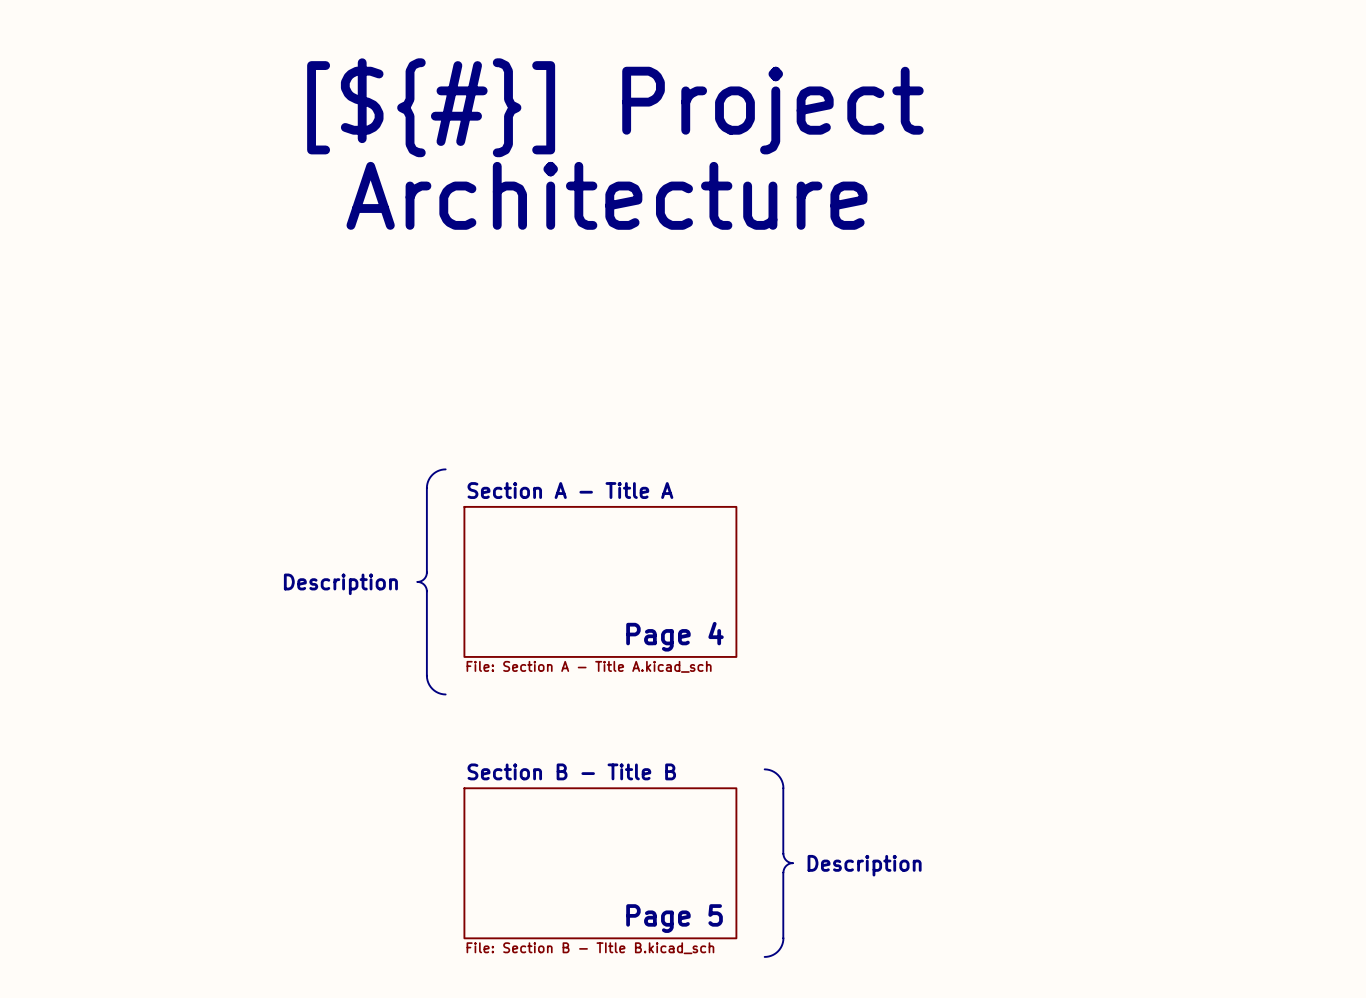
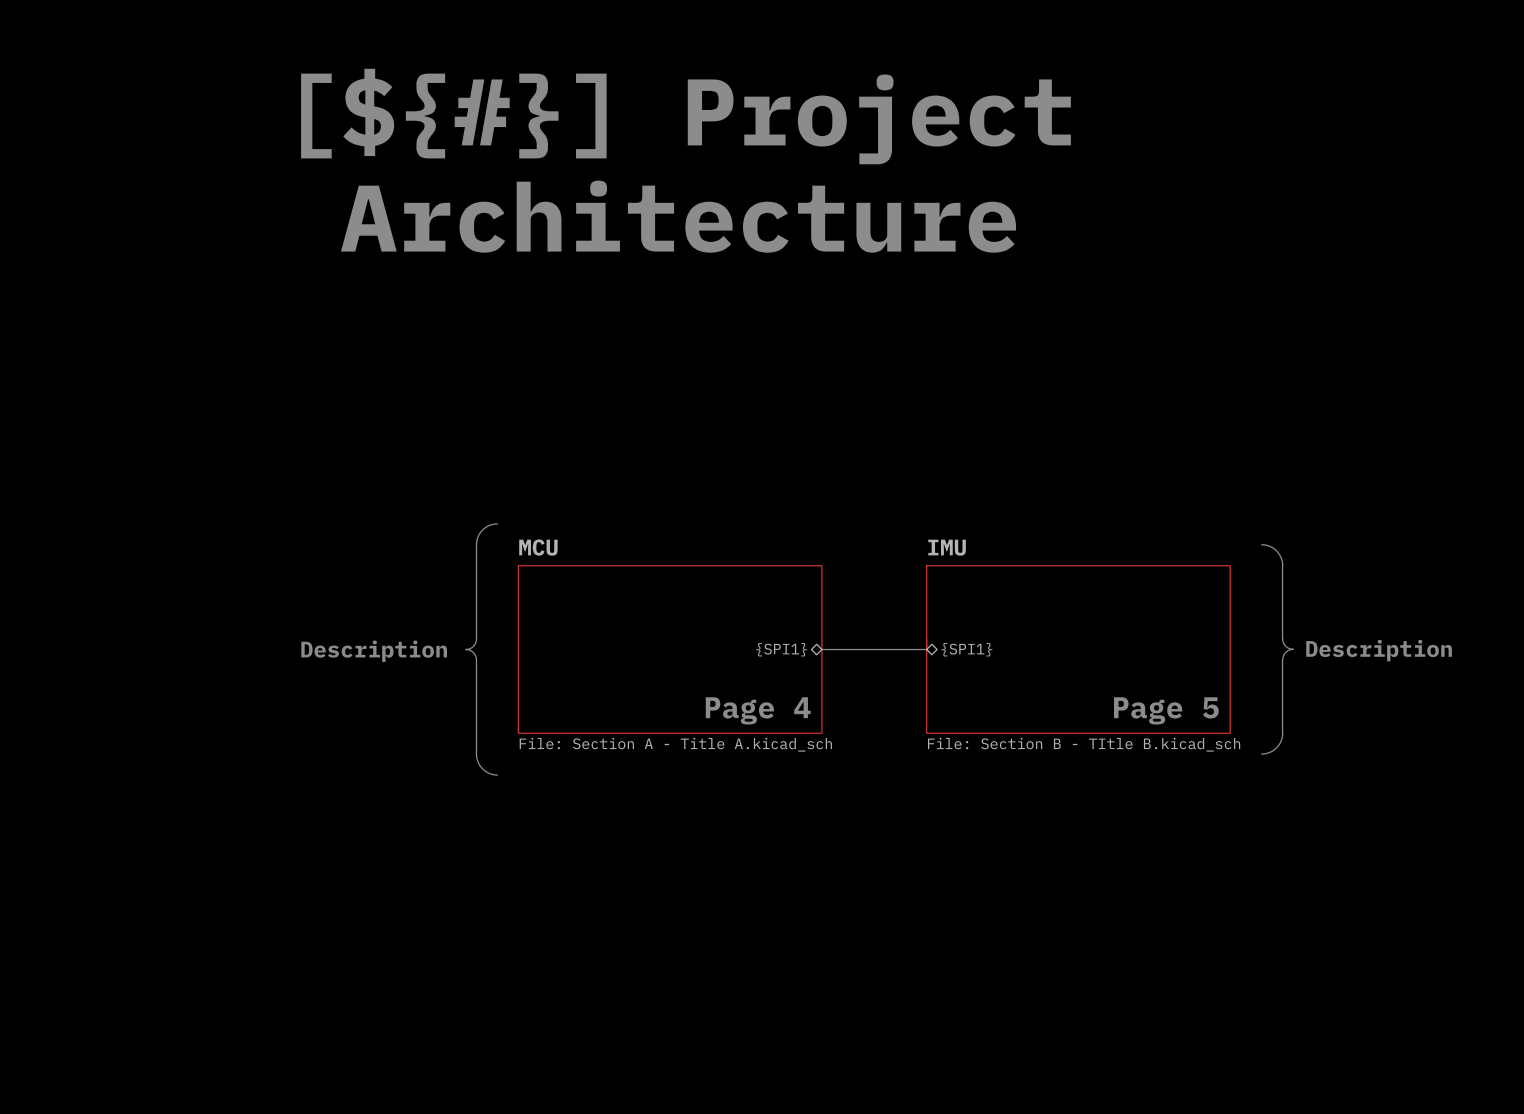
line: none -> (1261, 544) (1269, 546) (1276, 550) (1281, 557) (1282, 565)
sheet Section A - Title A name: Section A - Title A (570, 490) -> MCU (538, 547)
line: none -> (1282, 565) (1282, 639)
line: none -> (1282, 638) (1285, 646) (1293, 649) (1285, 652) (1282, 659)
bus: none -> (821, 649) (926, 649)
sheet IMU: none -> File: Section B - TItle B.kicad_sch (1078, 649)
hierarchical label: none -> {SPI1} (781, 649)
hierarchical label: none -> {SPI1} (966, 649)
text: none -> Description (1379, 650)
line: none -> (1282, 659) (1282, 733)
text: none -> Page 5 (1166, 710)
line: none -> (1282, 733) (1280, 742) (1276, 747) (1270, 751) (1261, 754)
line: (764, 769) (777, 774) (783, 788) -> none
line: (783, 788) (783, 853) -> none
line: (783, 853) (786, 860) (792, 863) (786, 865) (783, 872) -> none
sheet Section B - Title B: File: Section B - TItle B.kicad_sch (600, 863) -> none
text: Description (864, 865) -> none
line: (783, 872) (783, 938) -> none
text: Page 5 (674, 918) -> none
line: (783, 938) (777, 951) (764, 956) -> none

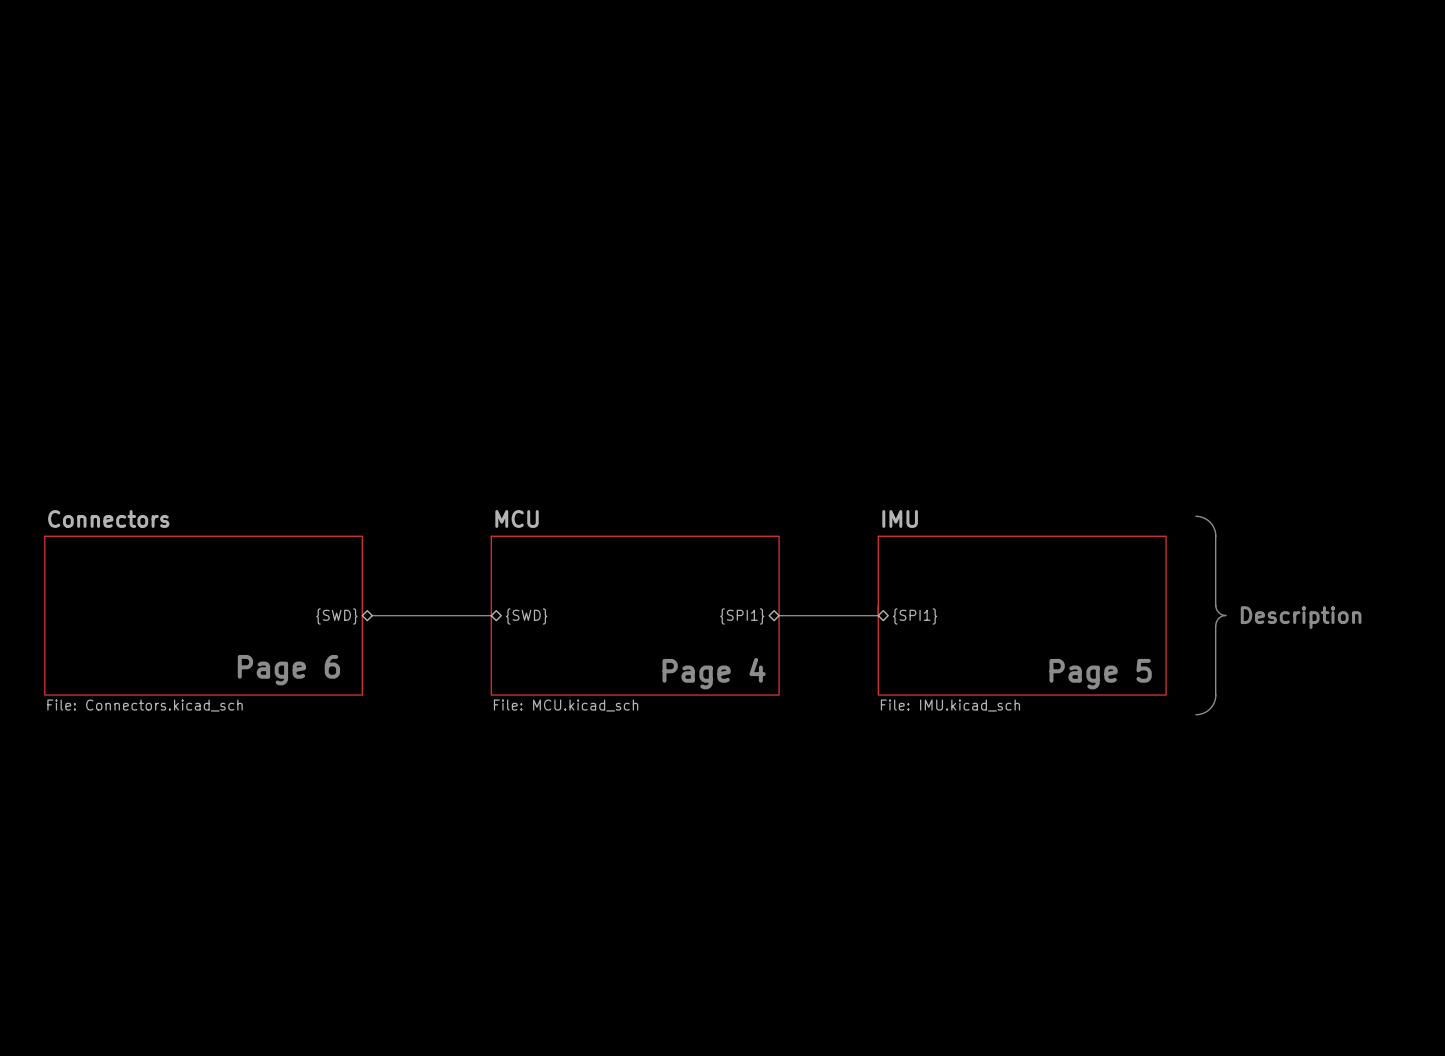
text: [${#}] Project (685, 116) -> none
text: Architecture (678, 216) -> none
line: (497, 523) (484, 528) (476, 540) (476, 640) (472, 647) (466, 649) (472, 651) (476, 658) (477, 759) (484, 770) (497, 775) -> none
sheet Connectors: none -> File: Connectors.kicad_sch (203, 615)
hierarchical label: none -> {SWD} (336, 616)
bus: none -> (372, 615) (491, 615)
hierarchical label: none -> {SWD} (526, 616)
text: Description (374, 651) -> none
text: none -> Page 6 (288, 670)
sheet MCU value: File: Section A - Title A.kicad_sch (675, 744) -> File: MCU.kicad_sch (566, 705)
sheet IMU value: File: Section B - TItle B.kicad_sch (1084, 744) -> File: IMU.kicad_sch (950, 705)

